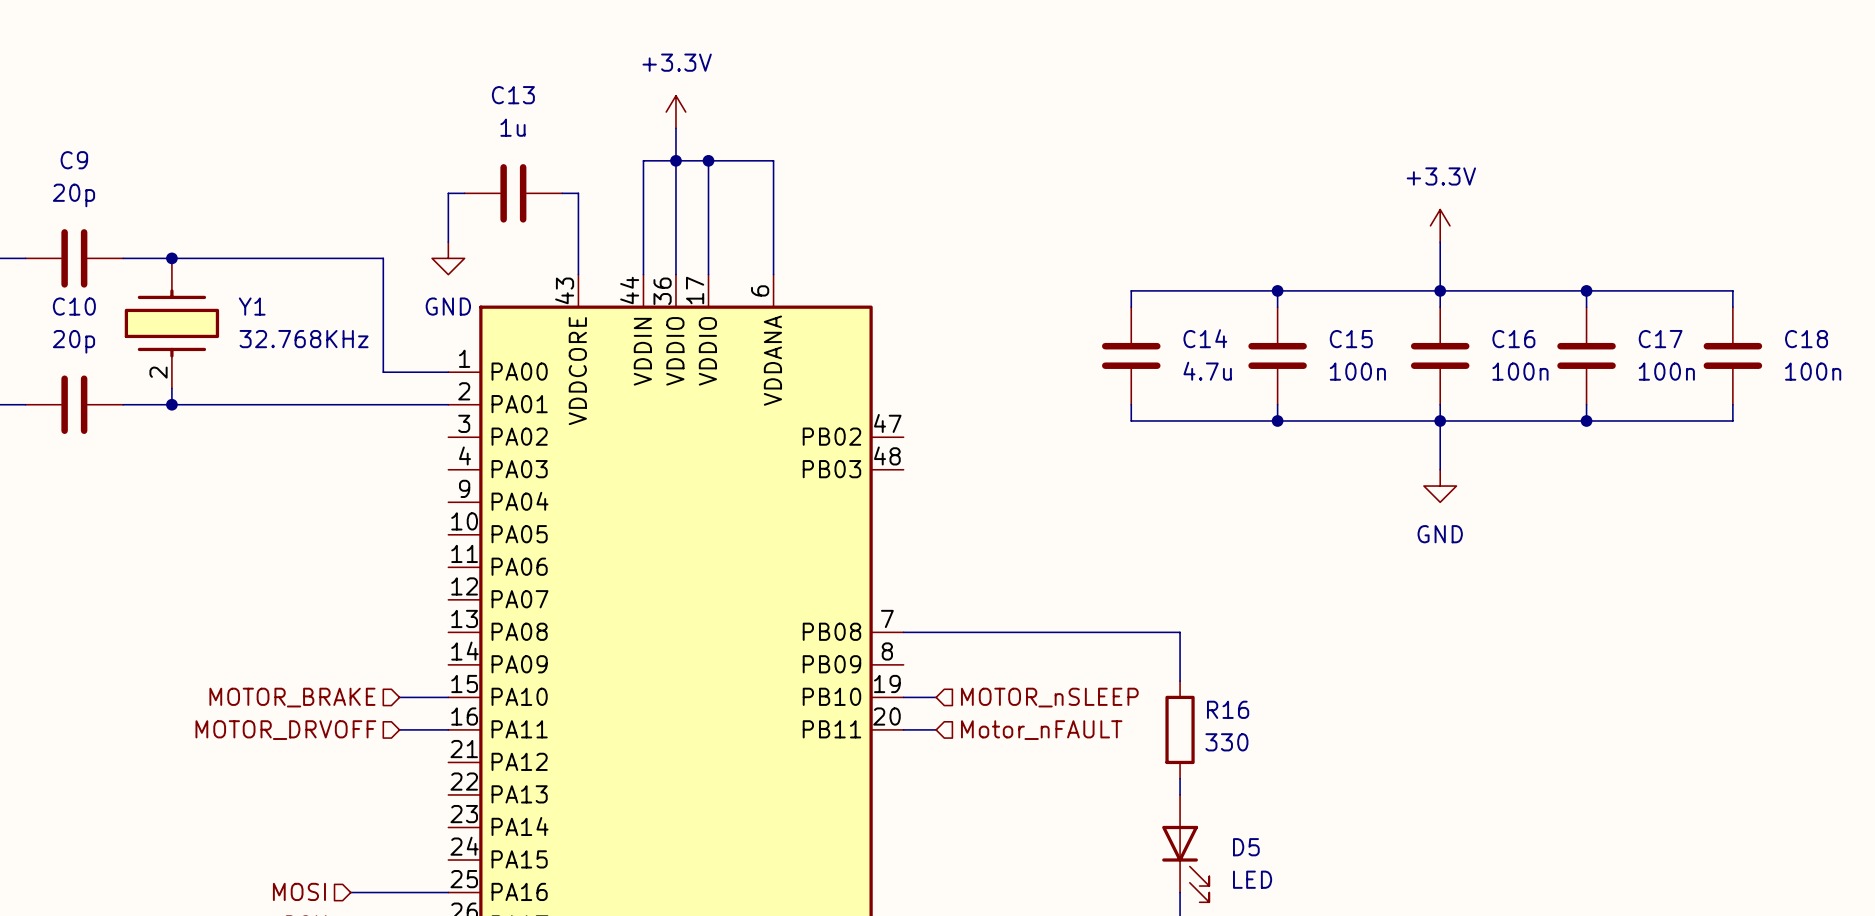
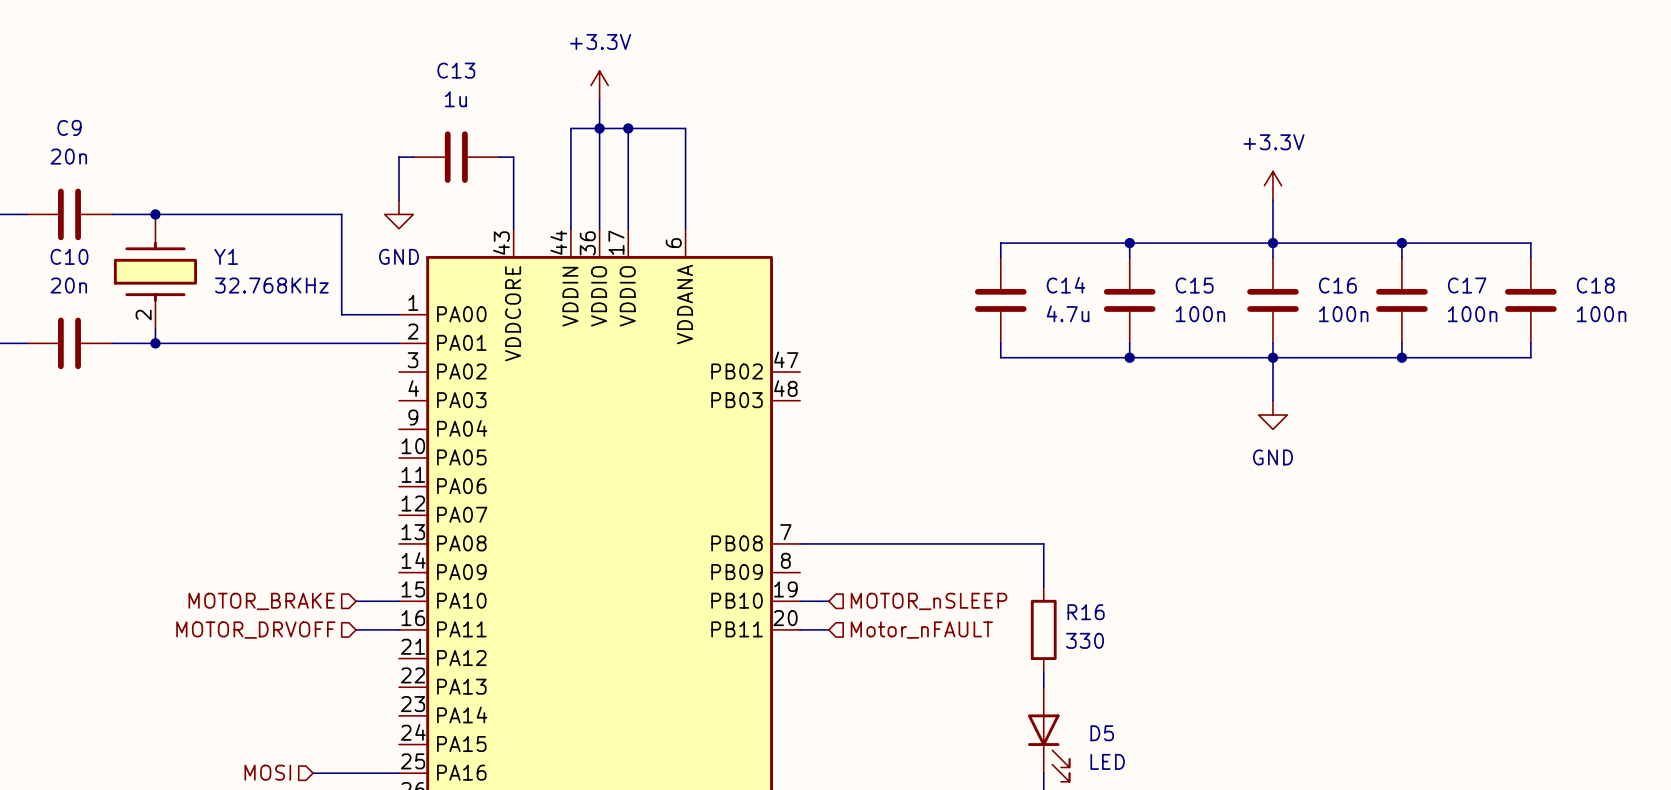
C9 value: 20p (73, 195) -> 20n (68, 156)
C10 value: 20p (73, 341) -> 20n (68, 285)

